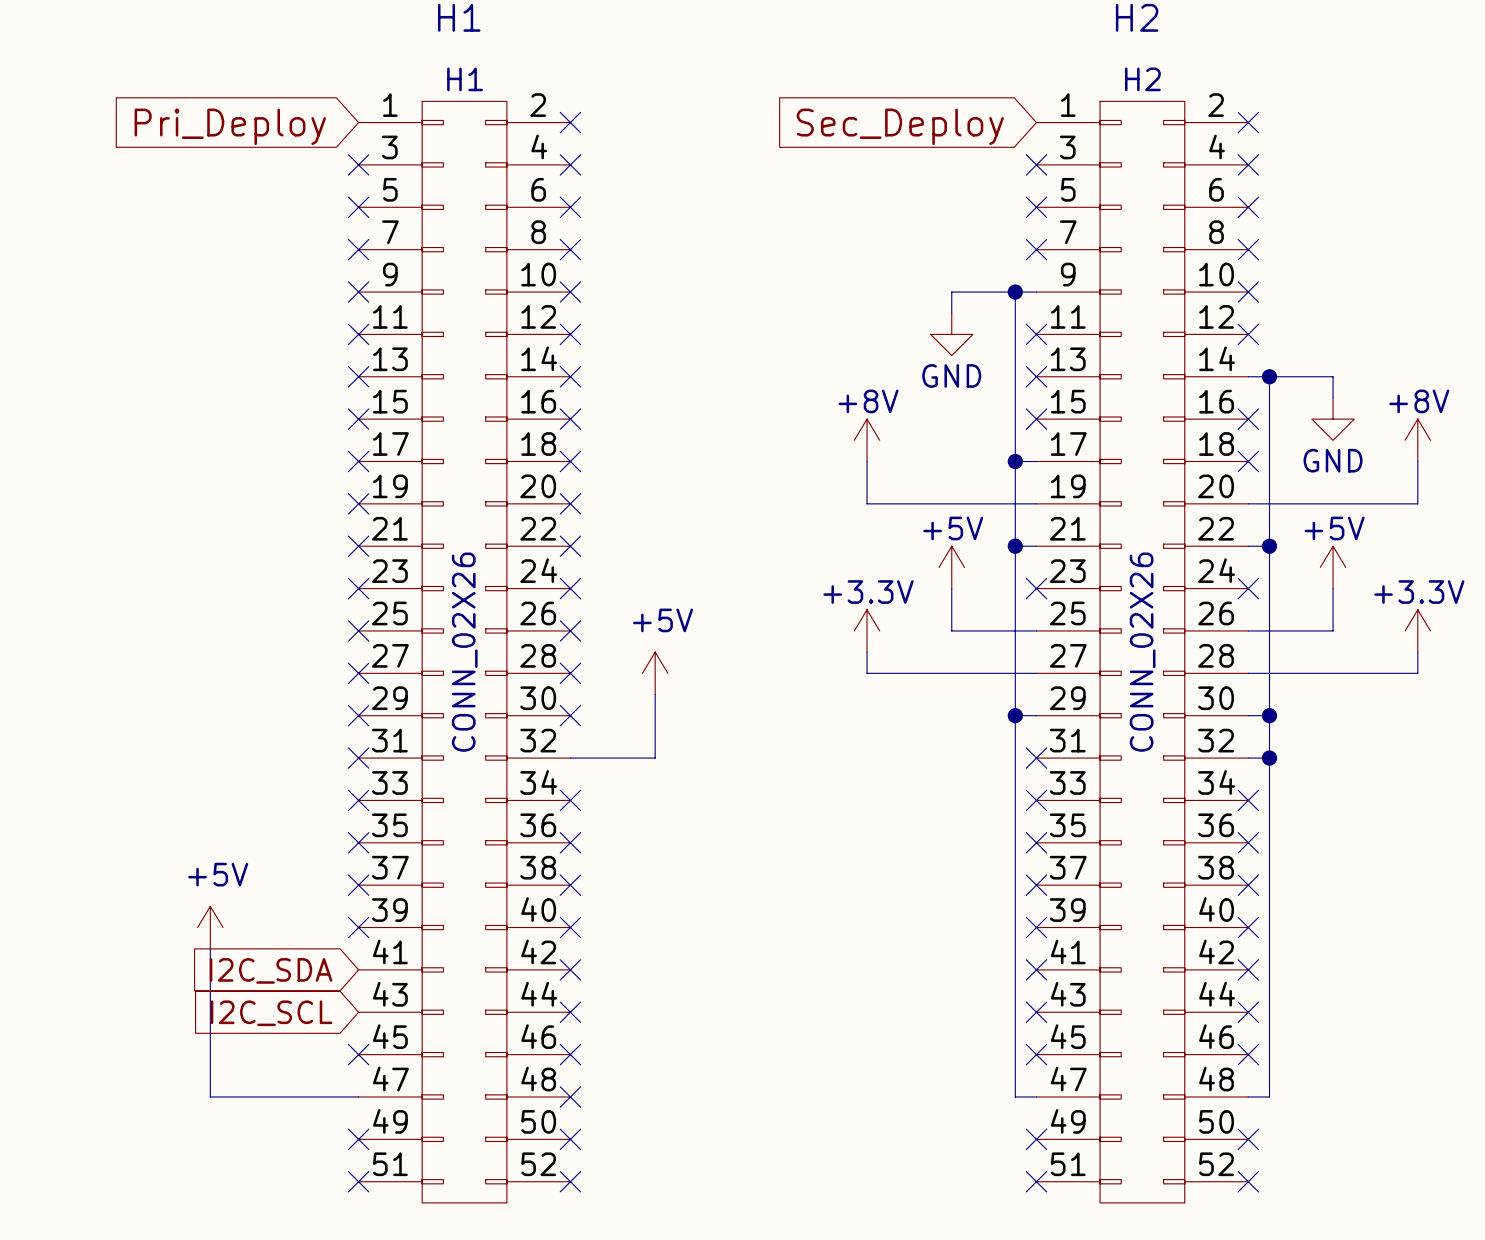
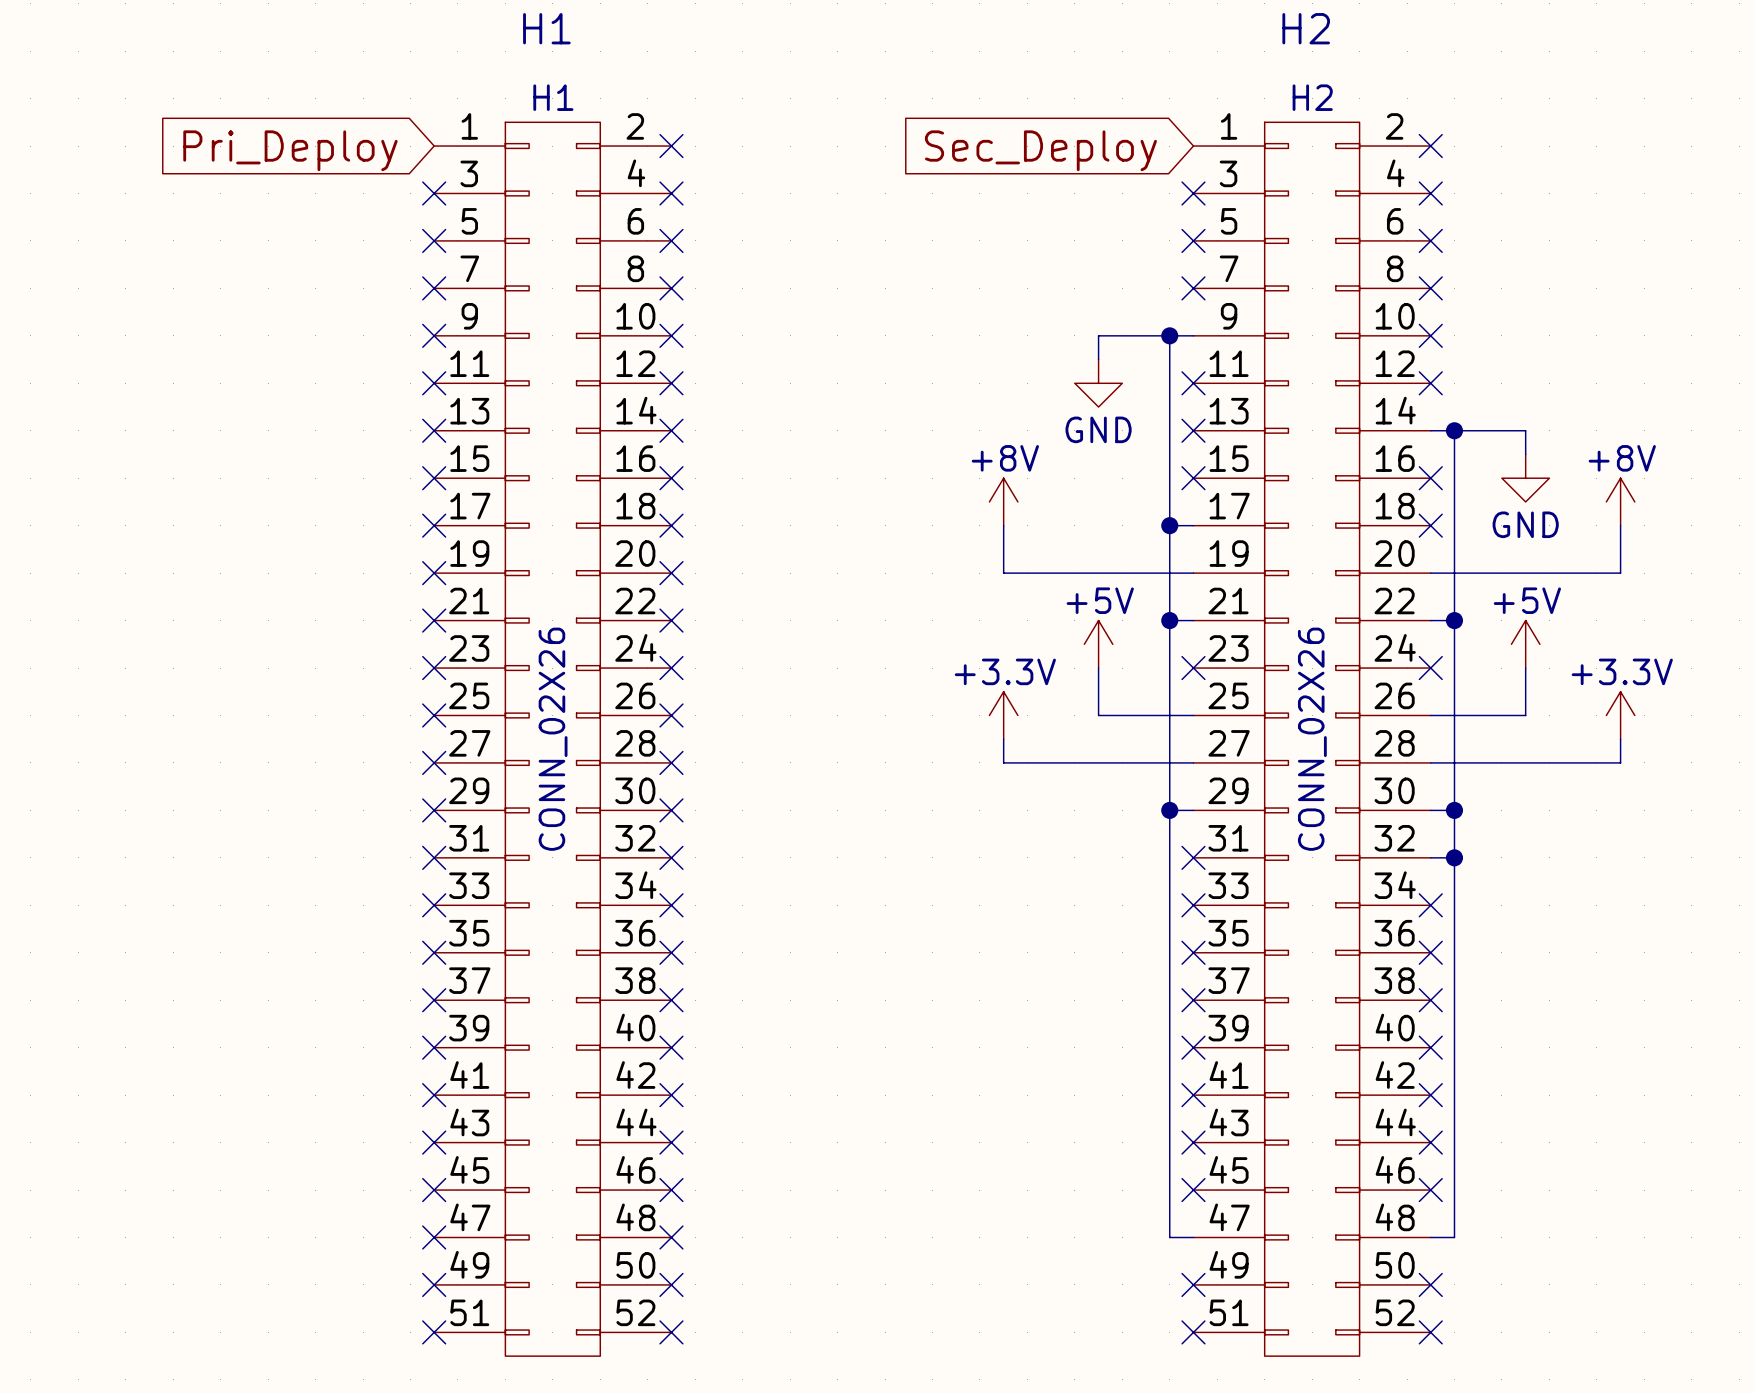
power symbol: +5V (655, 673) -> none
wire: (655, 694) (655, 758) (570, 758) -> none
no-connect mark: none -> (671, 857)
power symbol: +5V (210, 927) -> none
wire: (210, 948) (210, 1097) (358, 1097) -> none
no-connect mark: none -> (434, 1095)
global label: I2C_SDA (271, 970) -> none
no-connect mark: none -> (434, 1142)
global label: I2C_SCL (271, 1013) -> none
no-connect mark: none -> (434, 1237)

